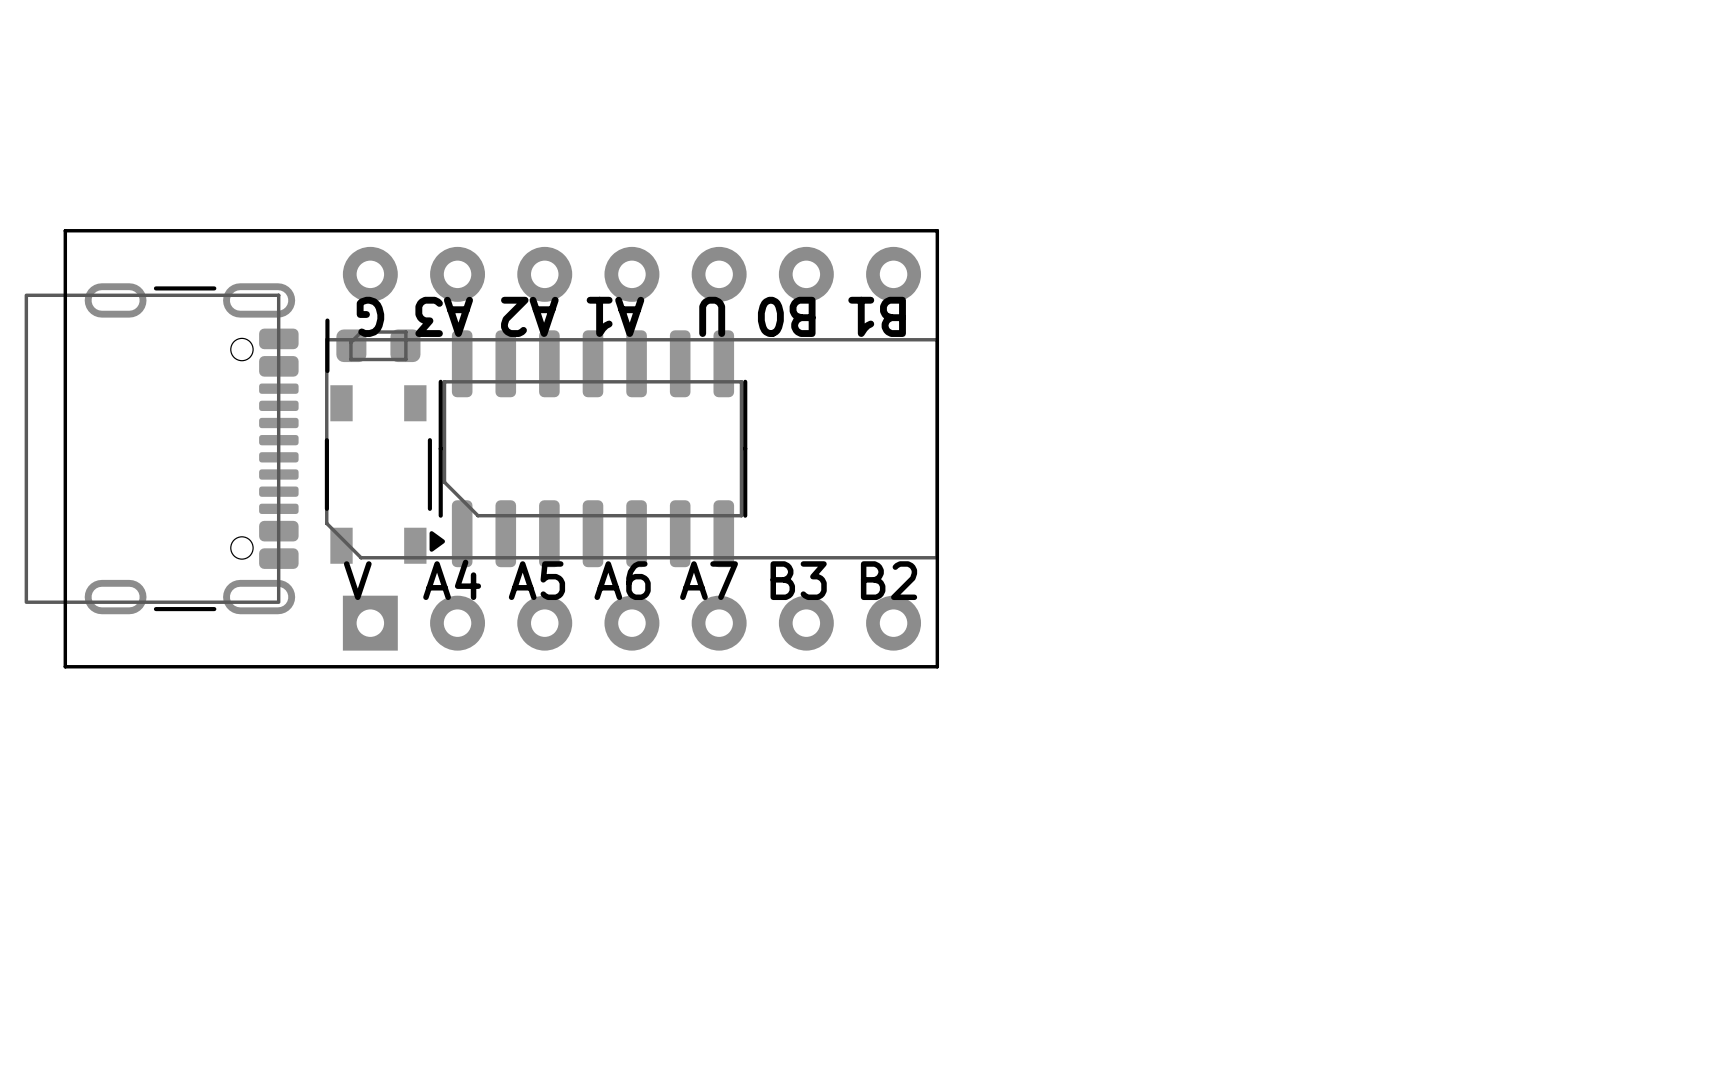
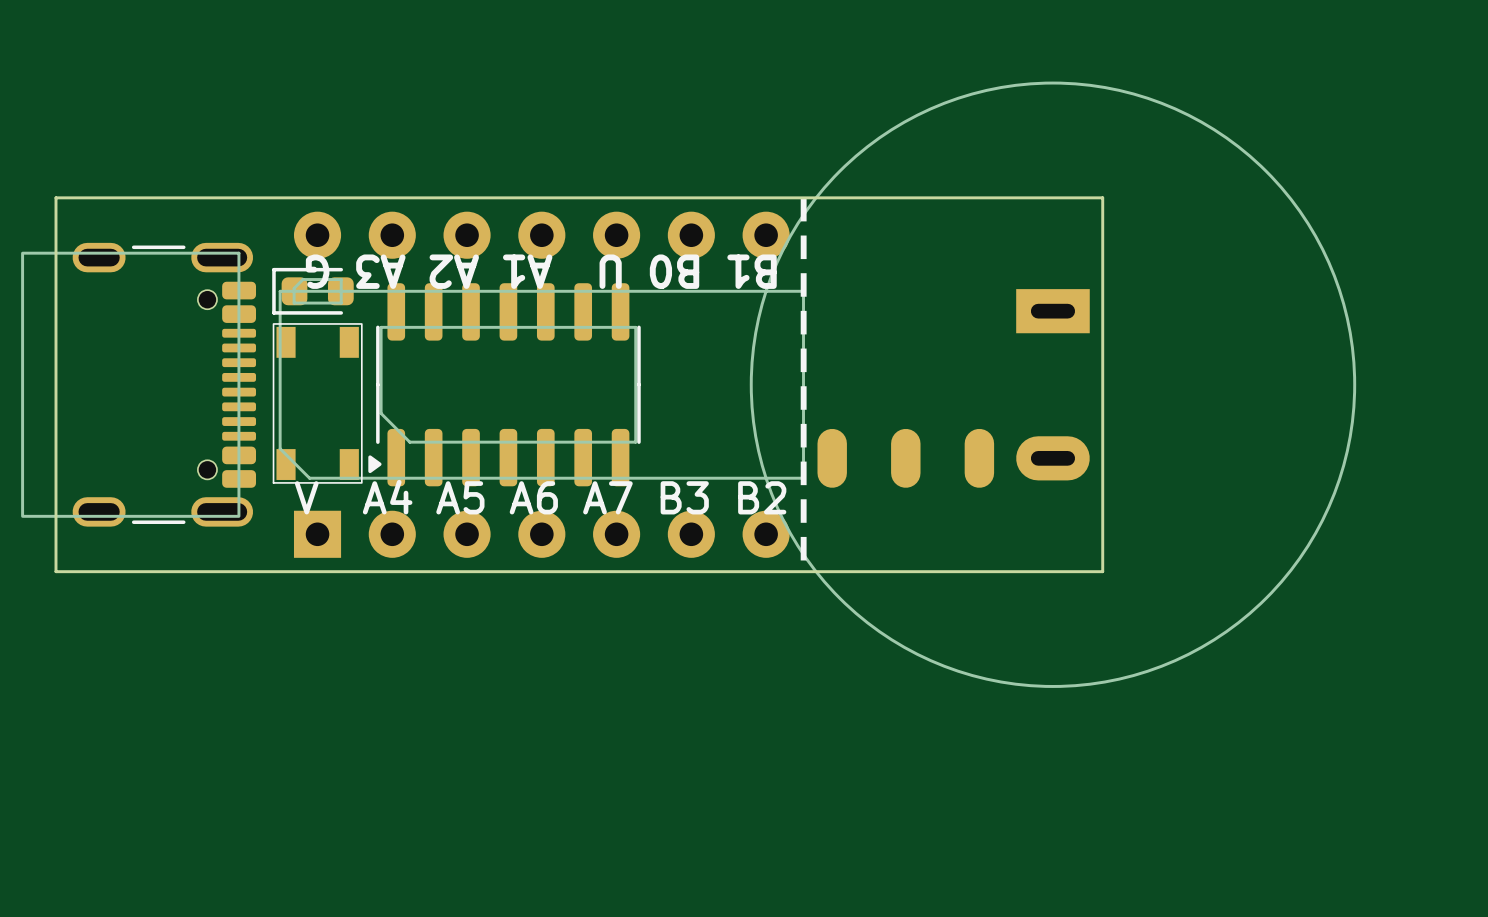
board edge: (937, 230) (937, 666) -> (803, 197) (1102, 197) (1102, 571) (803, 571)
line: none -> (803, 197) (803, 571)
part footprint: [325, 318, 421, 374] -> [272, 267, 354, 315]
part footprint: [324, 385, 432, 564] -> [272, 323, 363, 484]
part: none -> (1052, 384)
part: none -> (905, 458)

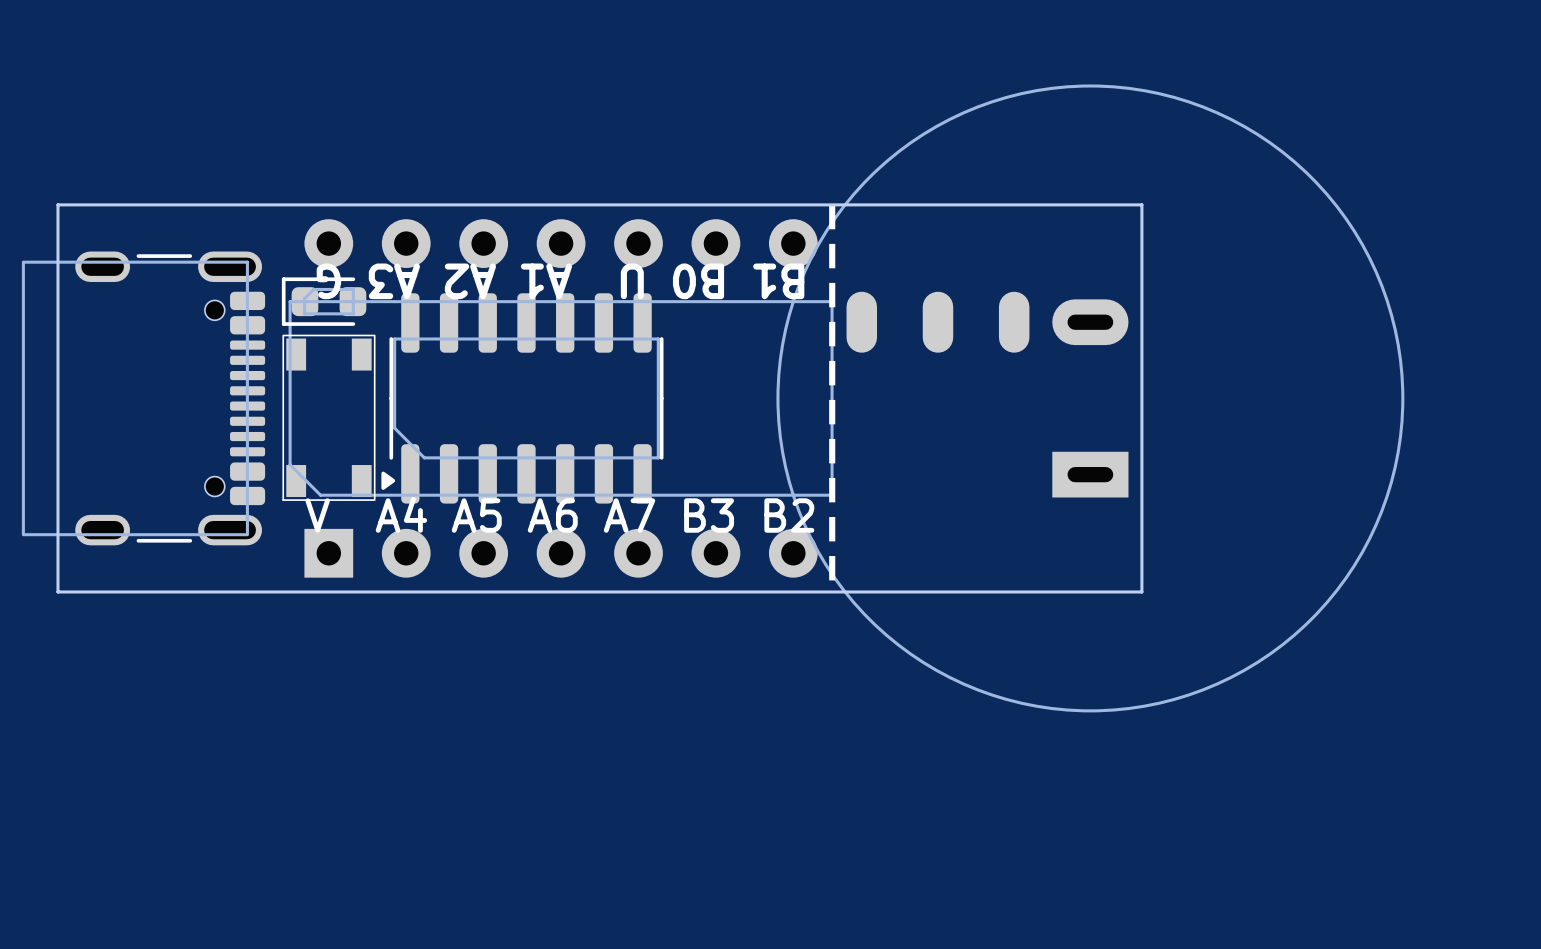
part rotation: 0° (1052, 384) -> 180° (1090, 398)
part position: (905, 458) -> (937, 322)

